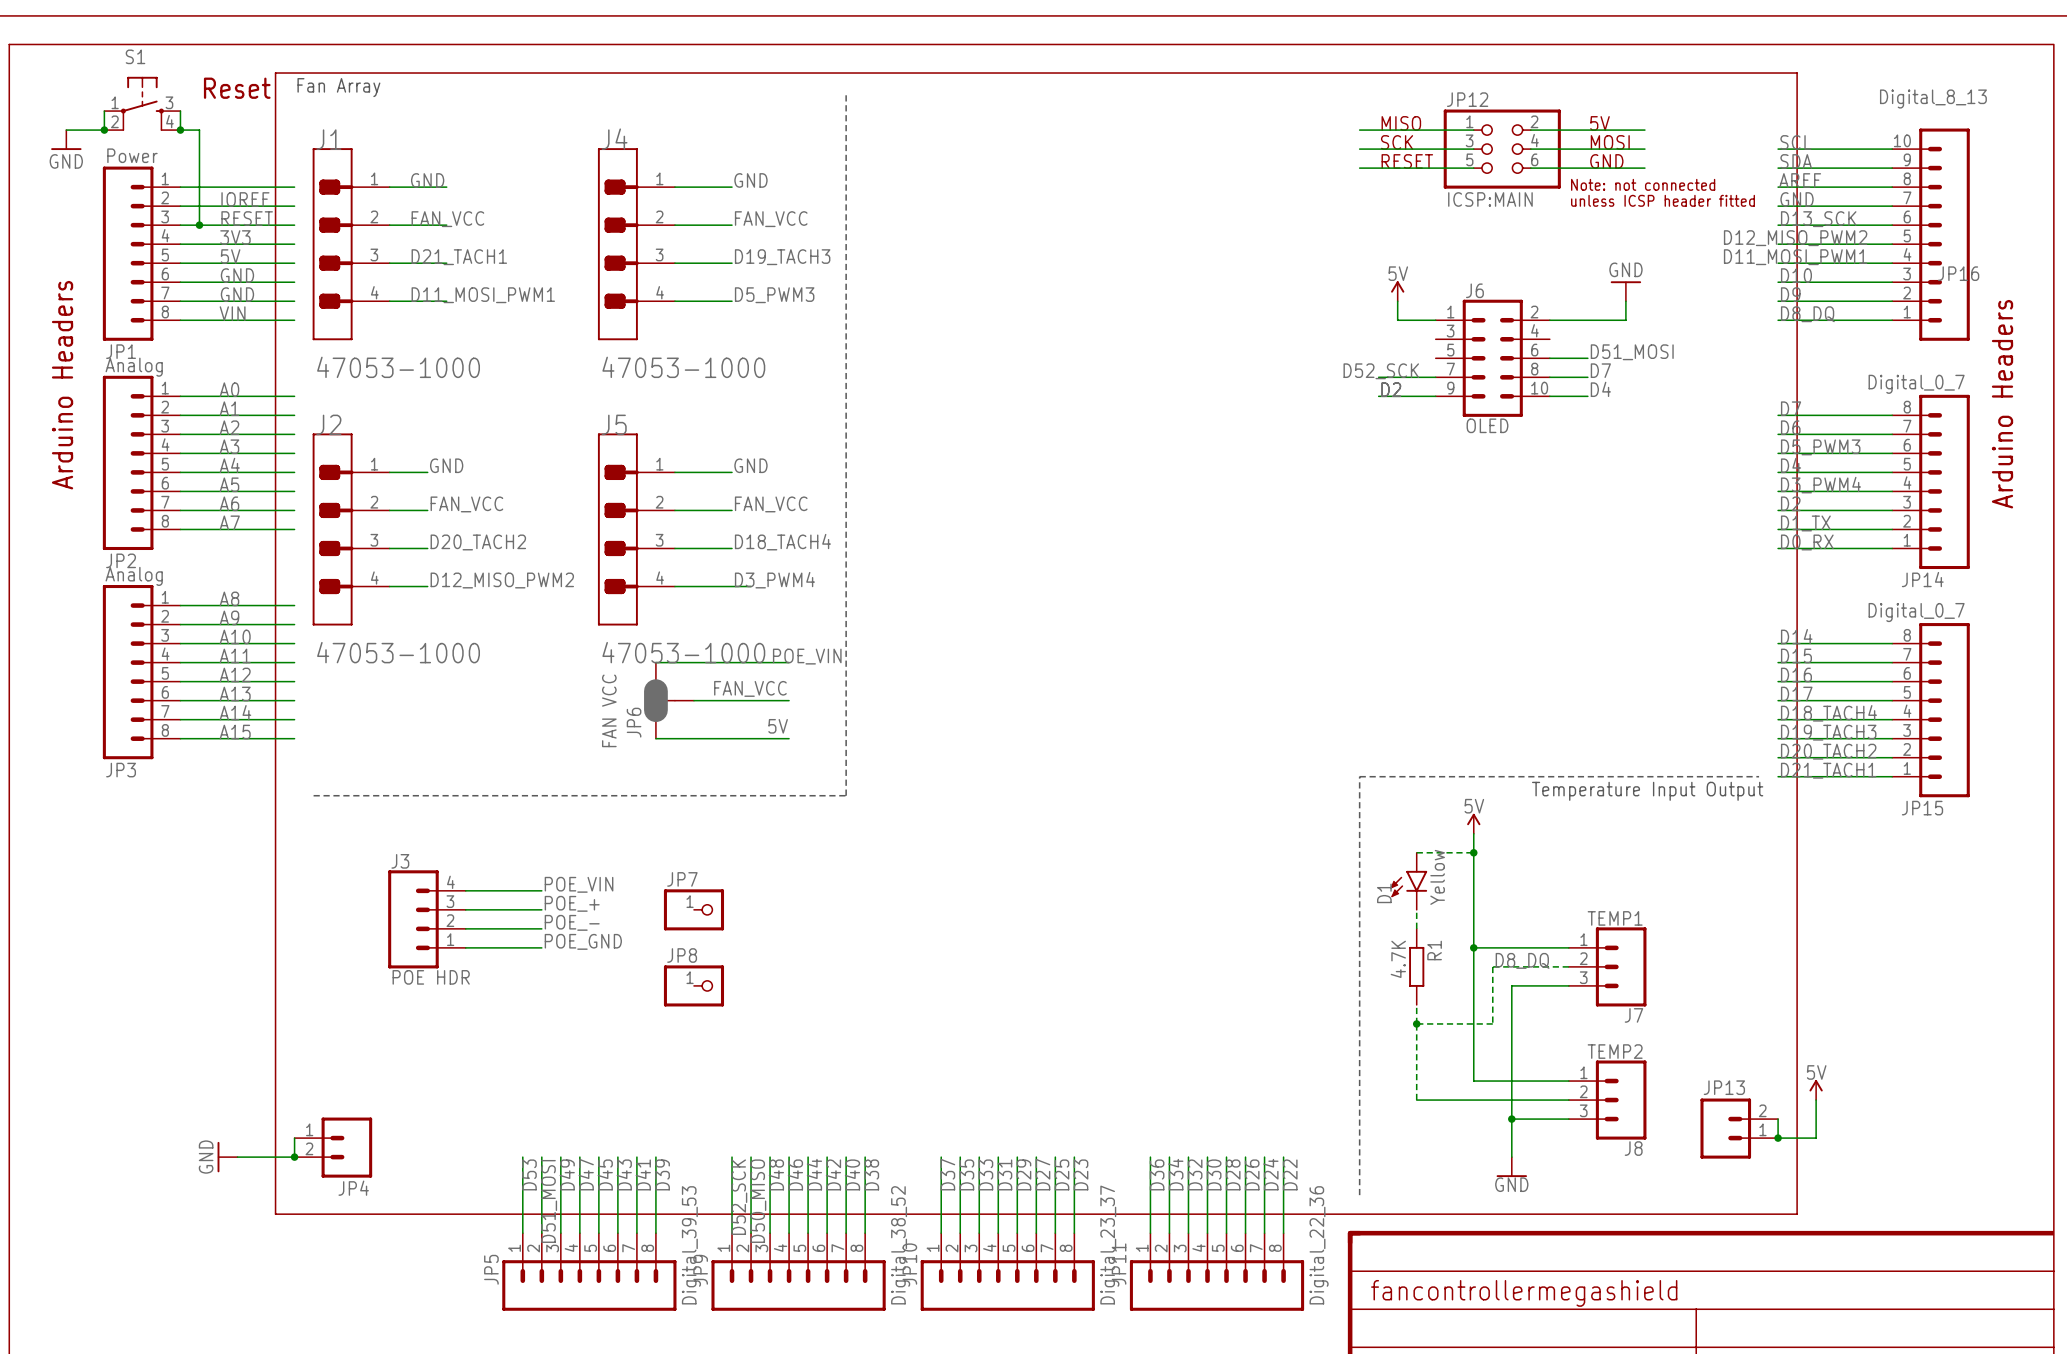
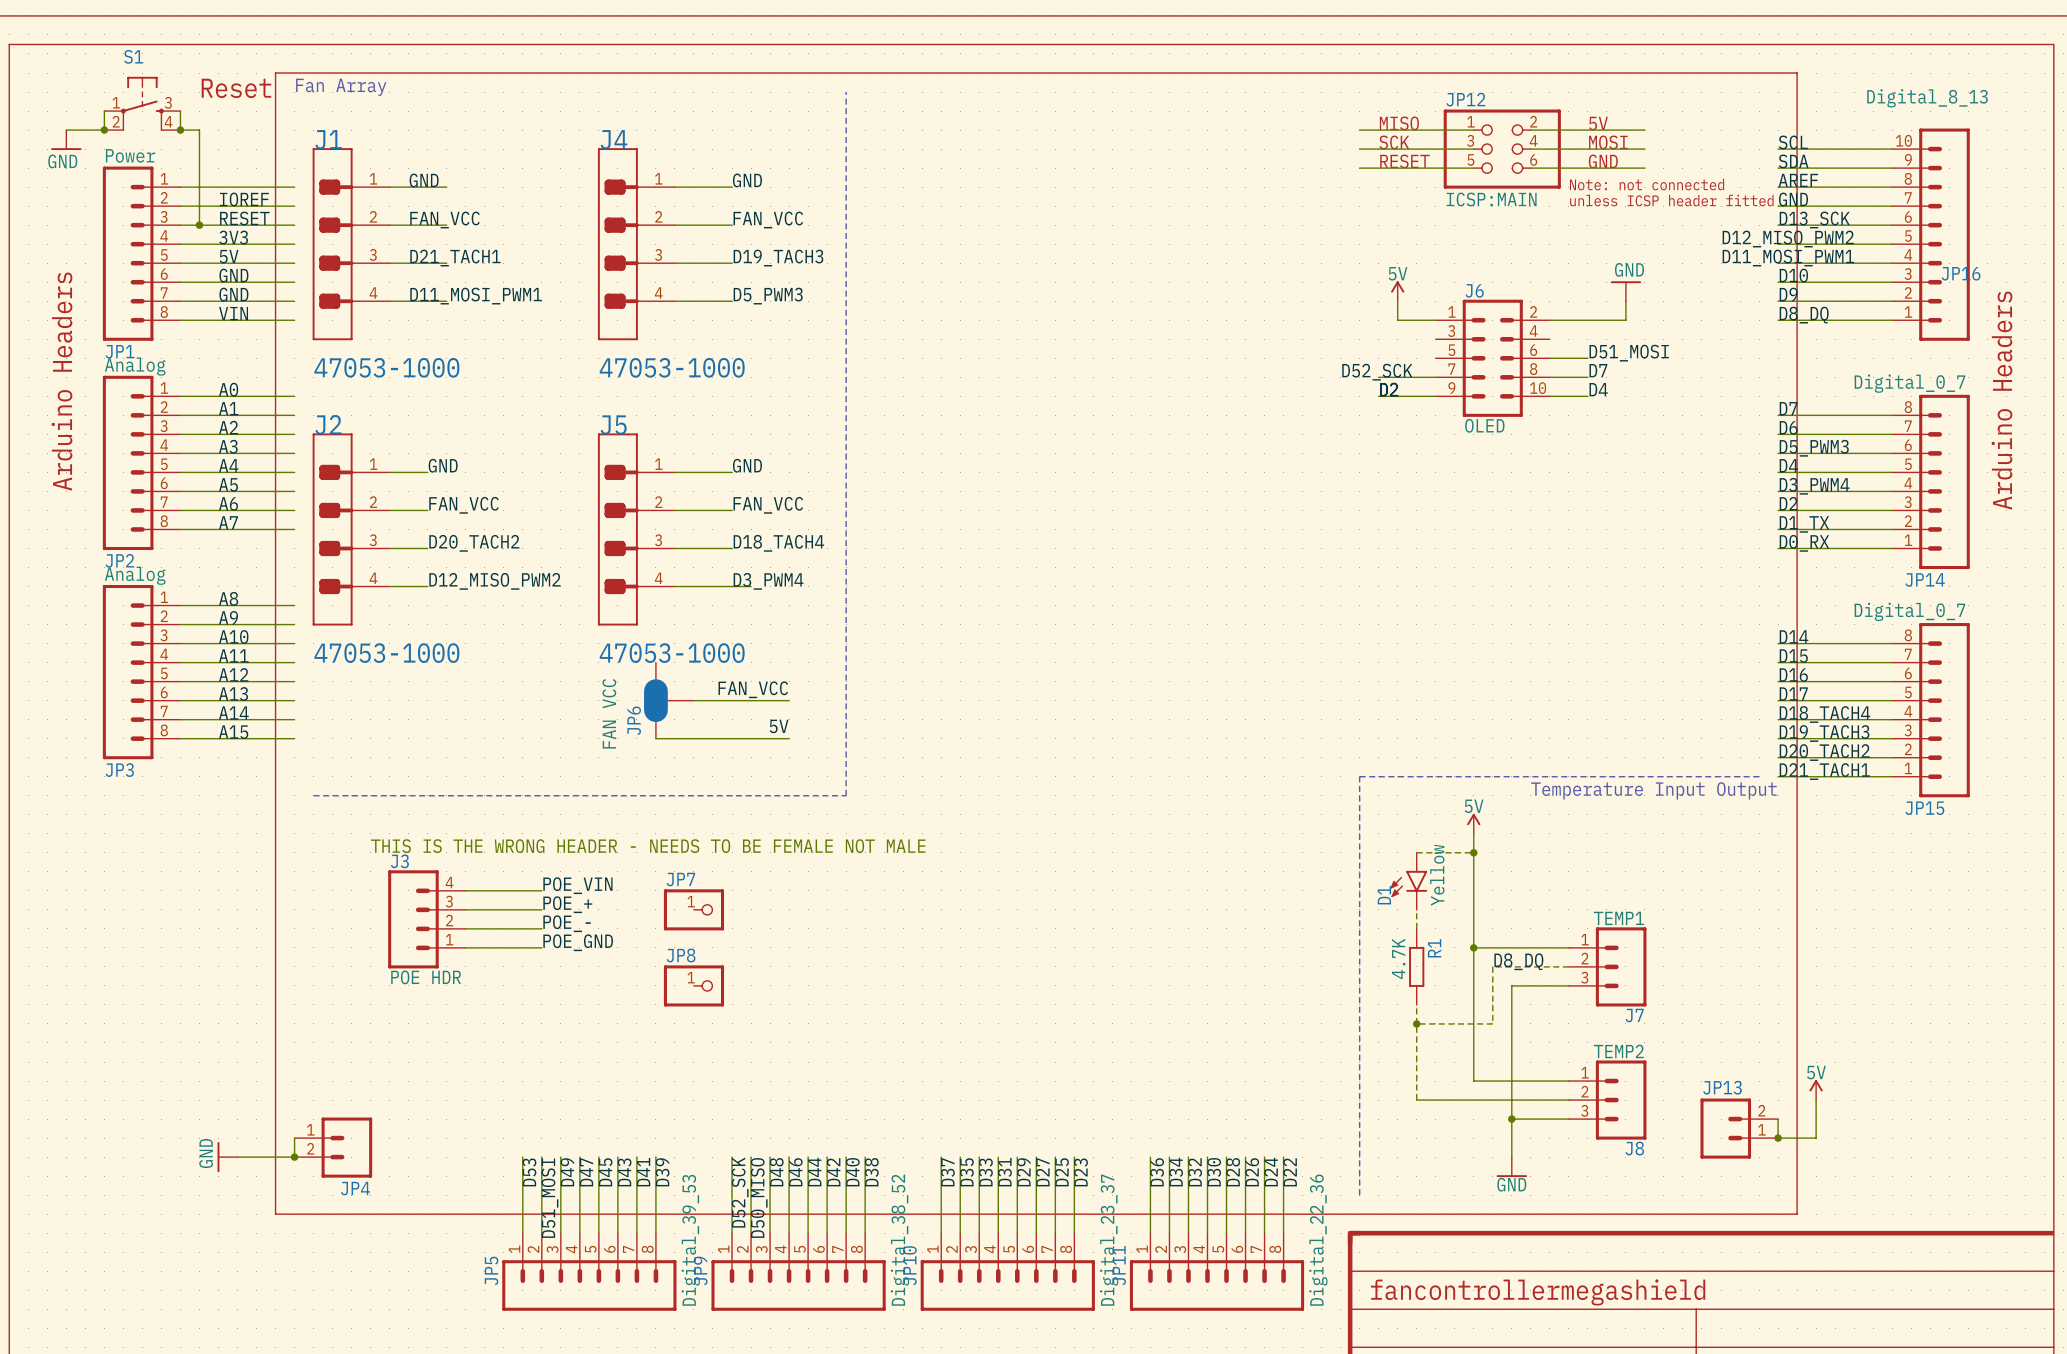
label: POE_VIN (807, 656) -> none
wire: (655, 662) (789, 662) -> none
text: none -> THIS IS THE WRONG HEADER - NEEDS TO BE FEMALE NOT MALE (648, 846)

